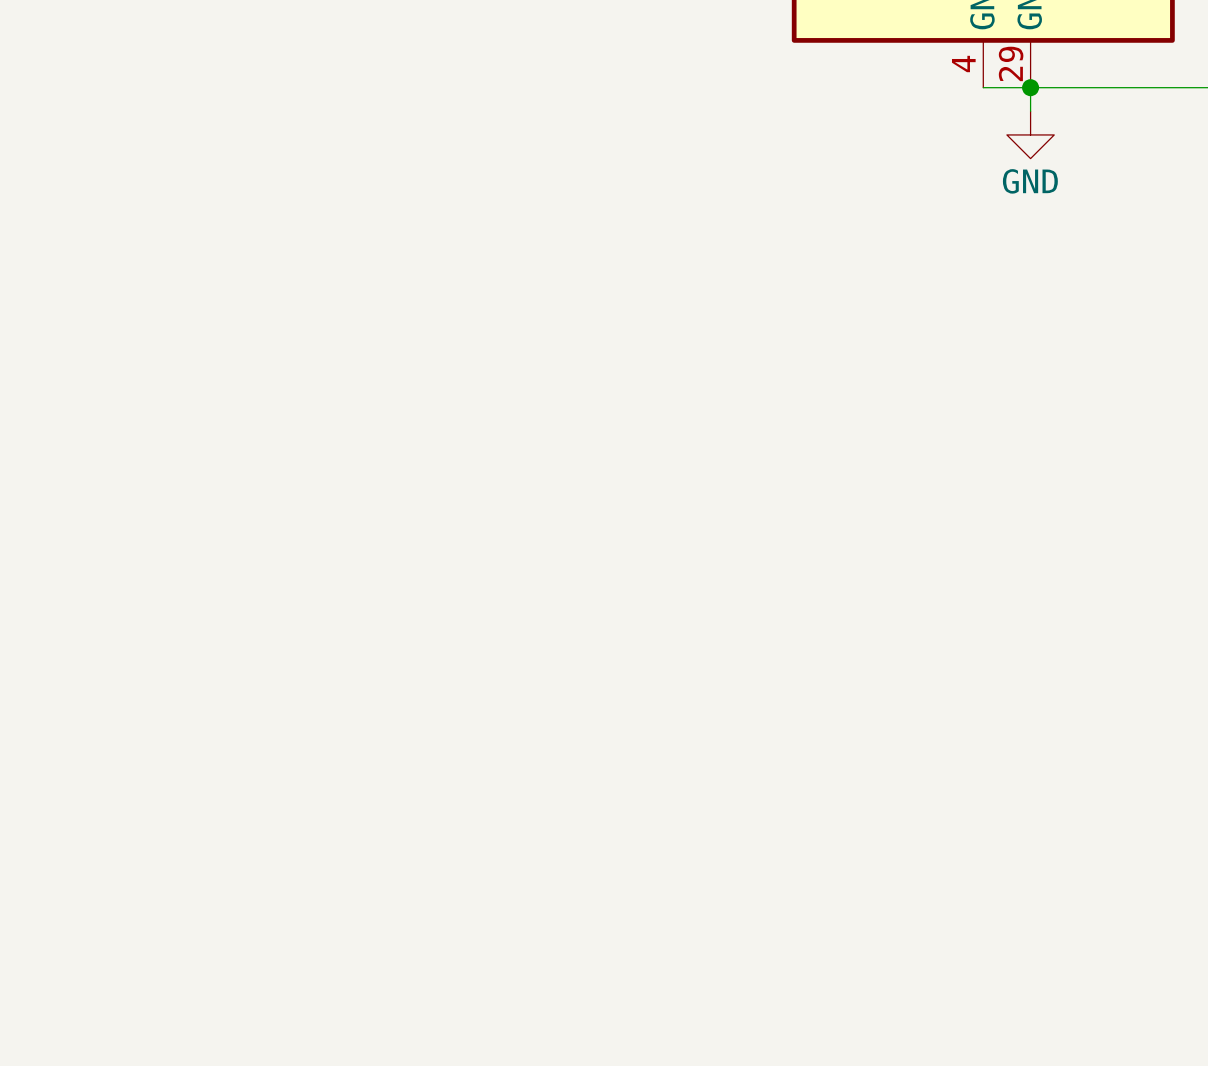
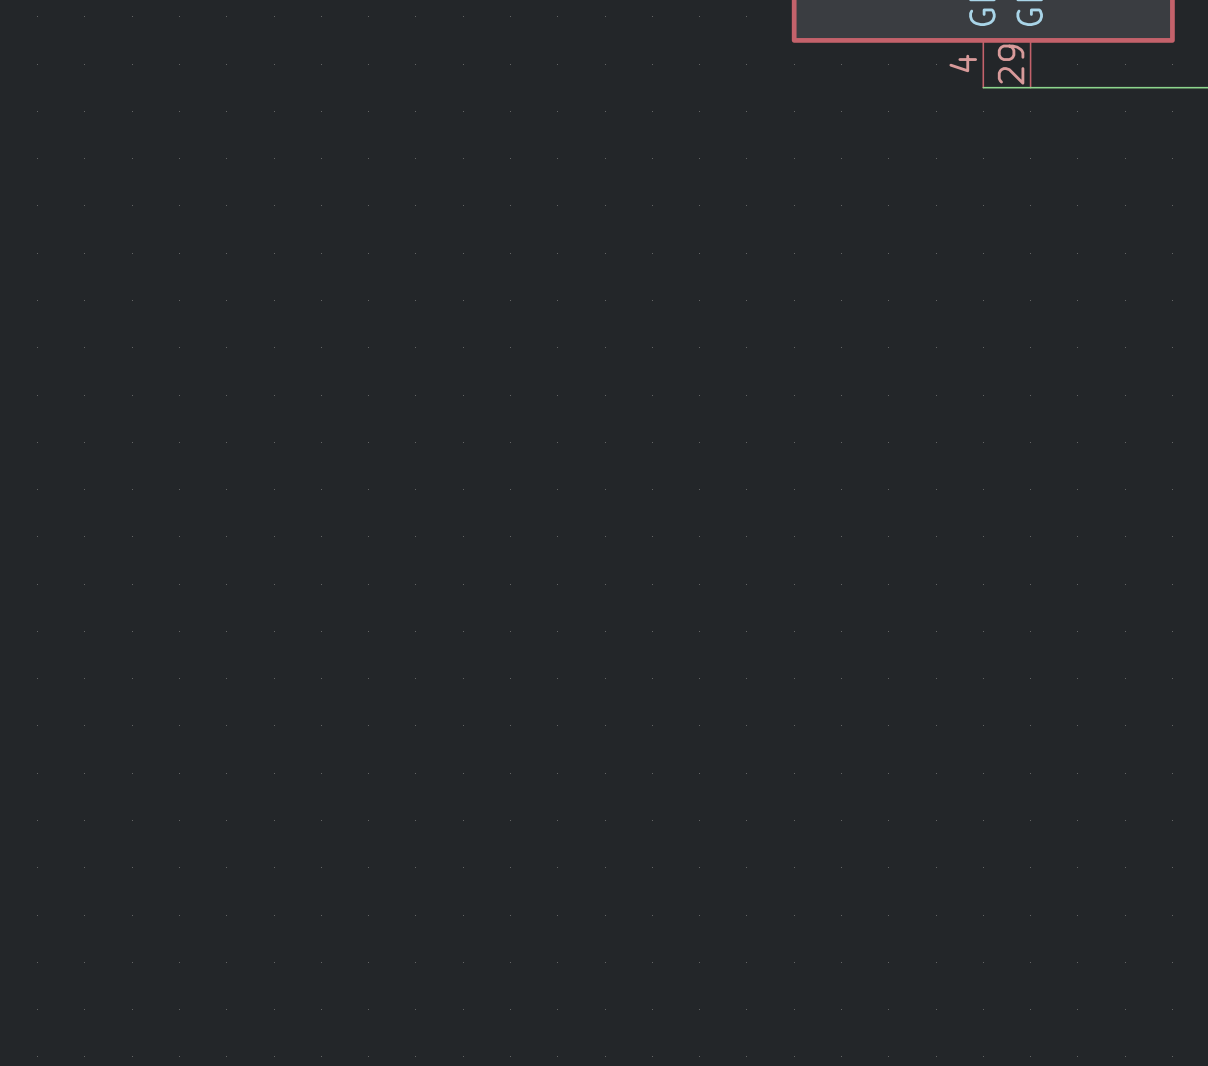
wire: (1030, 87) (1030, 111) -> none
junction: (1030, 87) -> none
power symbol: GND (1030, 134) -> none

